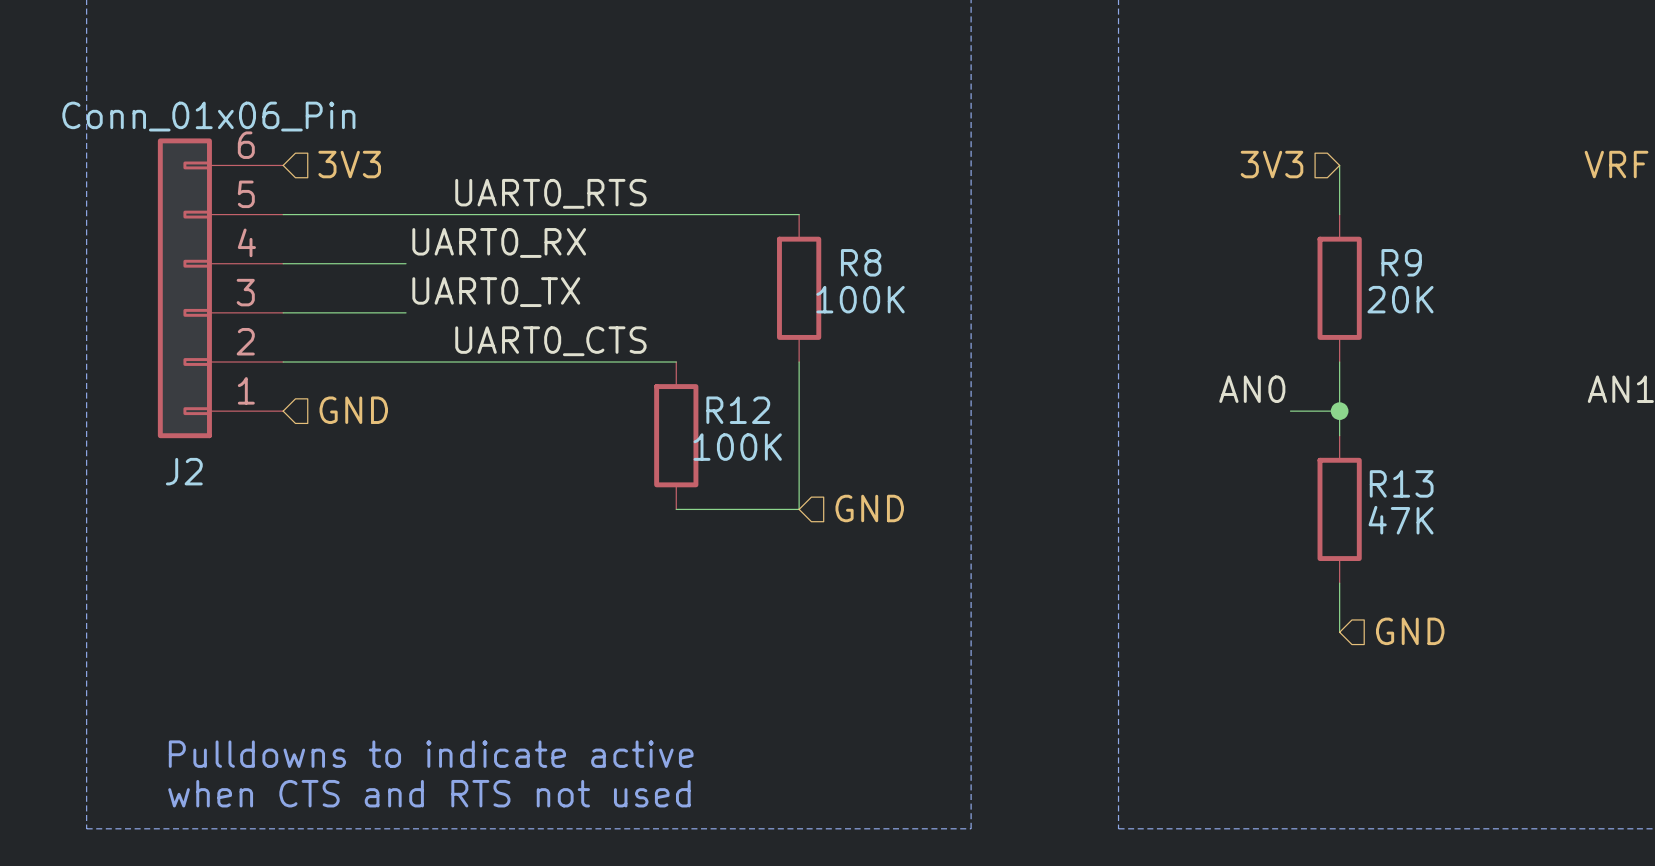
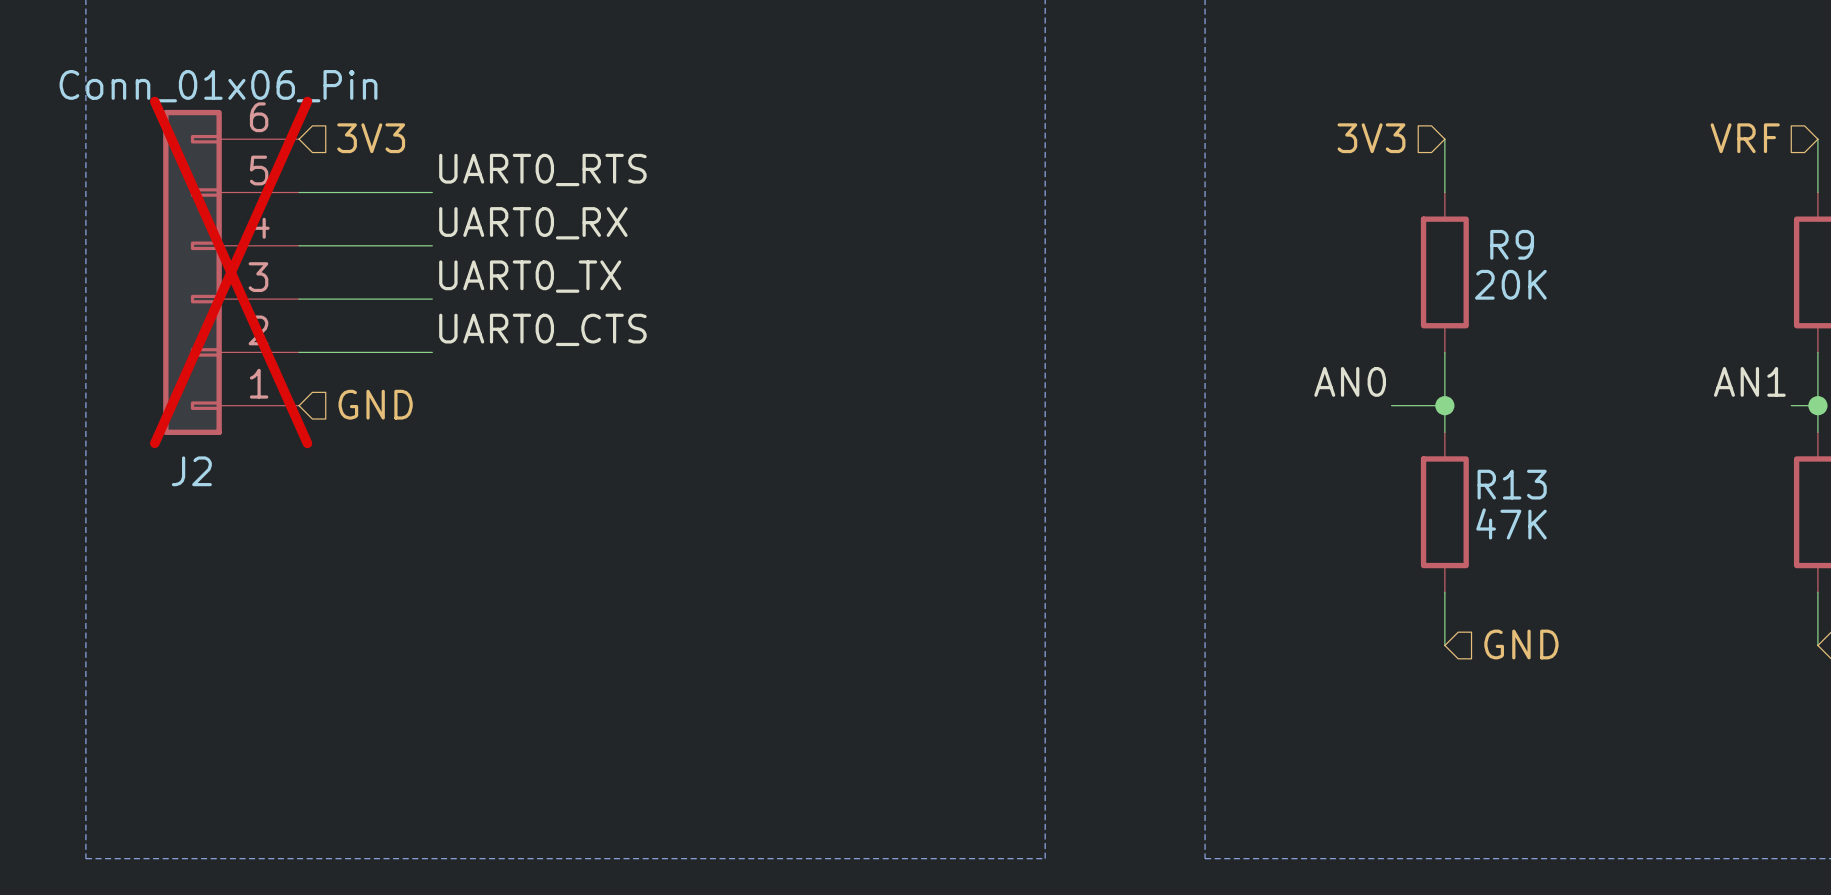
label position: UART0_RTS (550, 193) -> UART0_RTS (542, 169)
wire: (406, 214) (799, 214) -> none
J2 do-not-place cross: none -> (231, 272)
R8: 100K (799, 288) -> none
label position: UART0_CTS (550, 341) -> UART0_CTS (542, 329)
wire: (406, 362) (676, 362) -> none
wire: (799, 362) (799, 509) (676, 509) -> none
R12: 100K (676, 435) -> none
hierarchical label: GND (869, 508) -> none
text: Pulldowns to indicate active (431, 754) -> none
text: when CTS and RTS not used (429, 793) -> none

